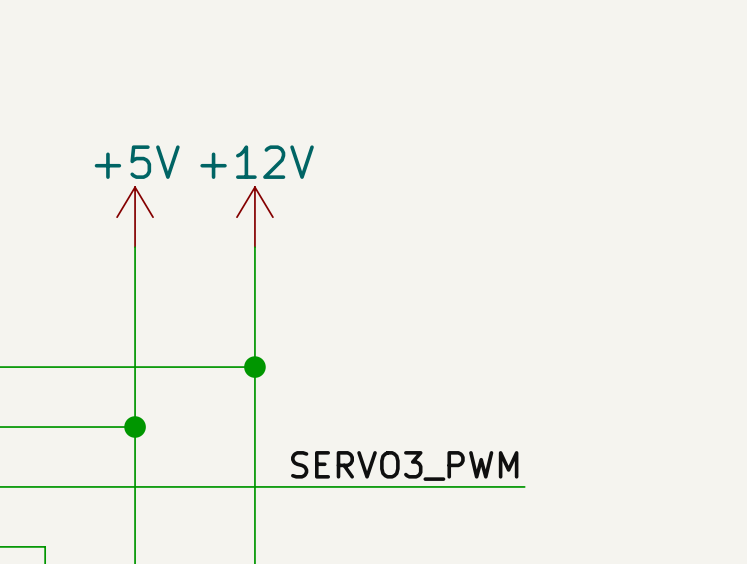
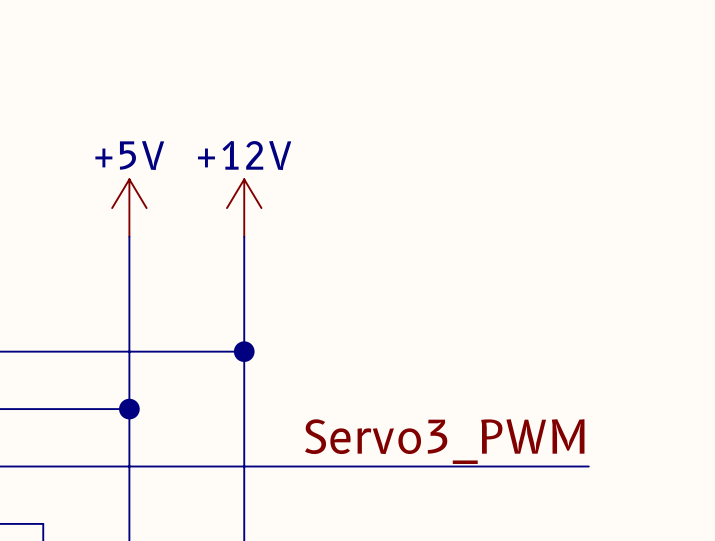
label: none -> Servo3_PWM (444, 441)
label: SERVO3_PWM (404, 465) -> none
wire: none -> (502, 466) (588, 466)

